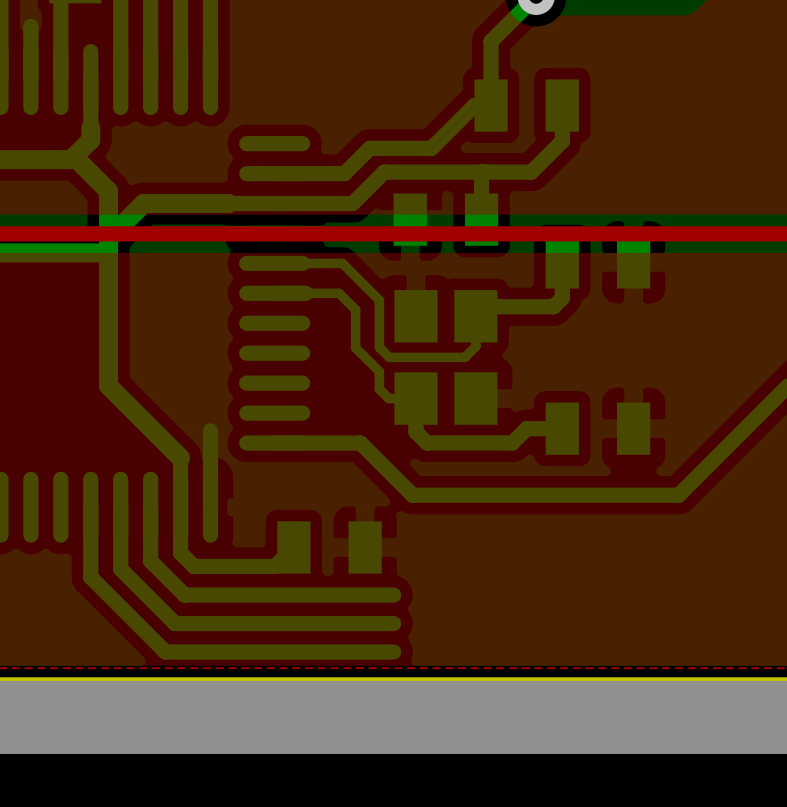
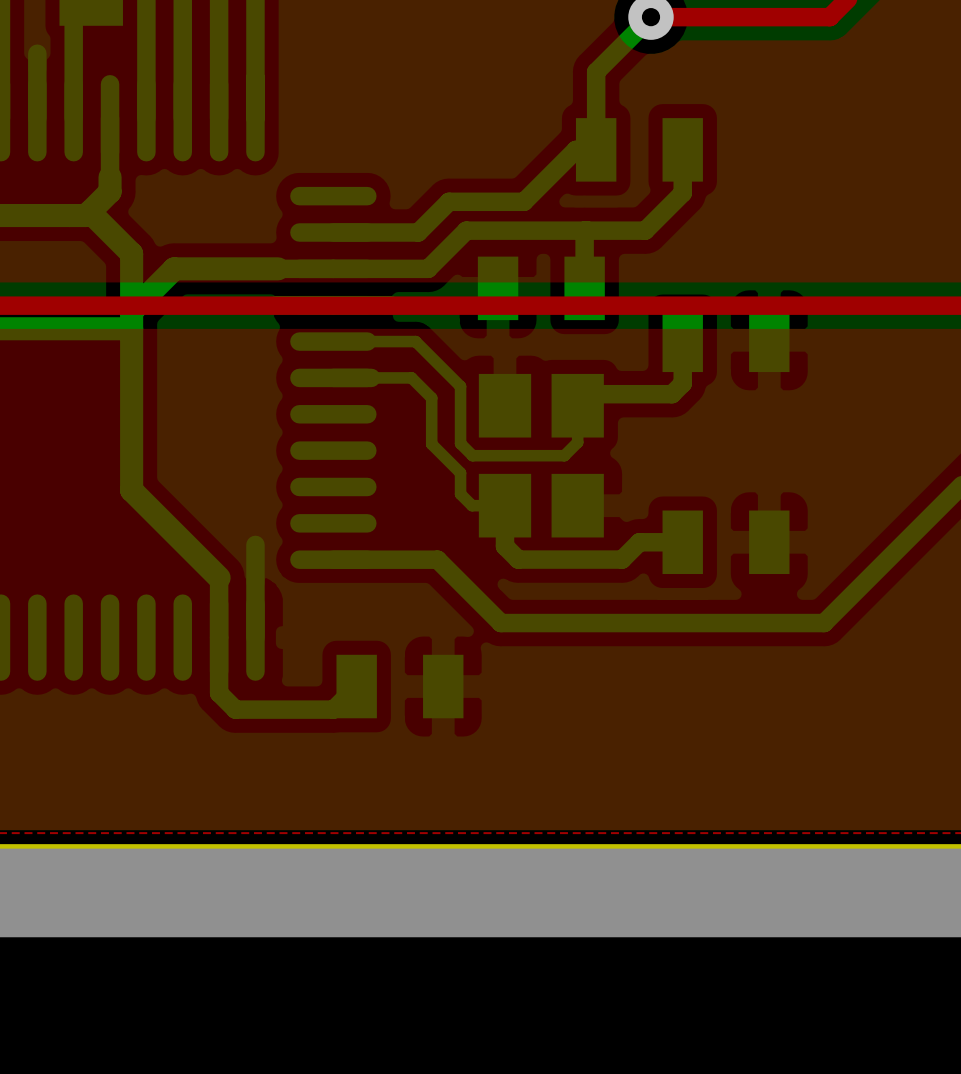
bottom track: (90, 507) (90, 577) (165, 652) (393, 652) -> none
bottom track: (120, 507) (120, 569) (175, 623) (393, 623) -> none
bottom track: (150, 507) (150, 561) (184, 595) (393, 595) -> none

